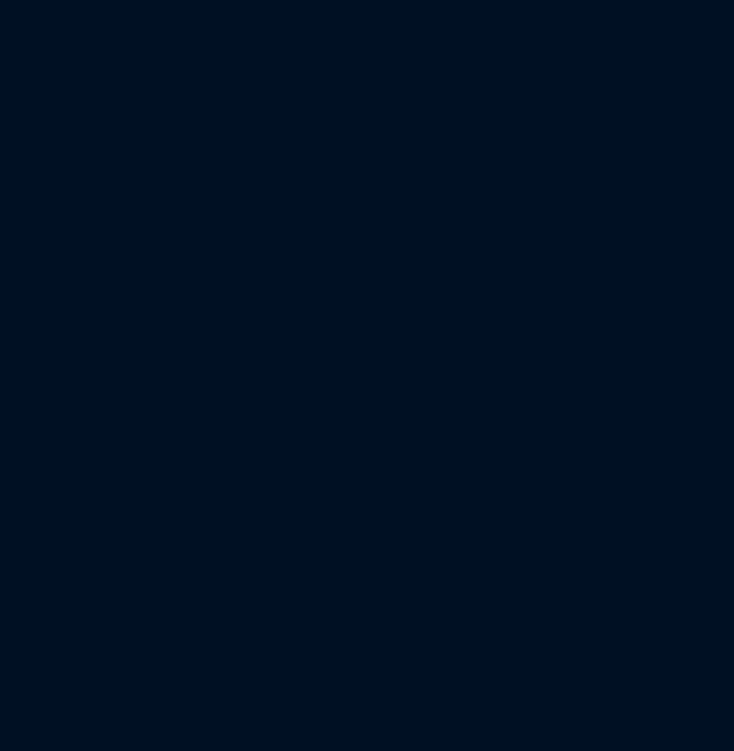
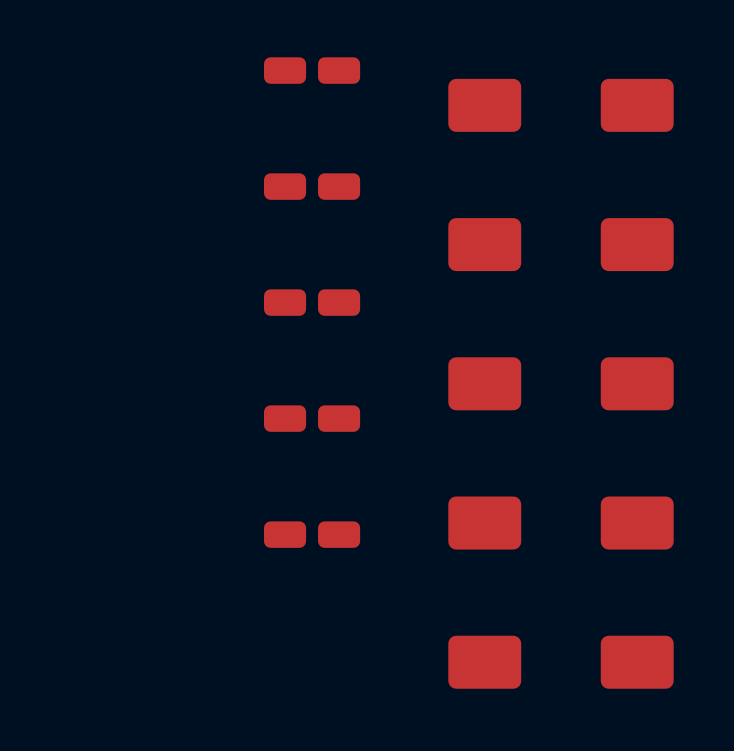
part: none -> (312, 70)
part: none -> (560, 105)
part: none -> (312, 186)
part: none -> (560, 244)
part: none -> (312, 302)
part: none -> (560, 383)
part: none -> (312, 418)
part: none -> (560, 523)
part: none -> (312, 534)
part: none -> (560, 662)

